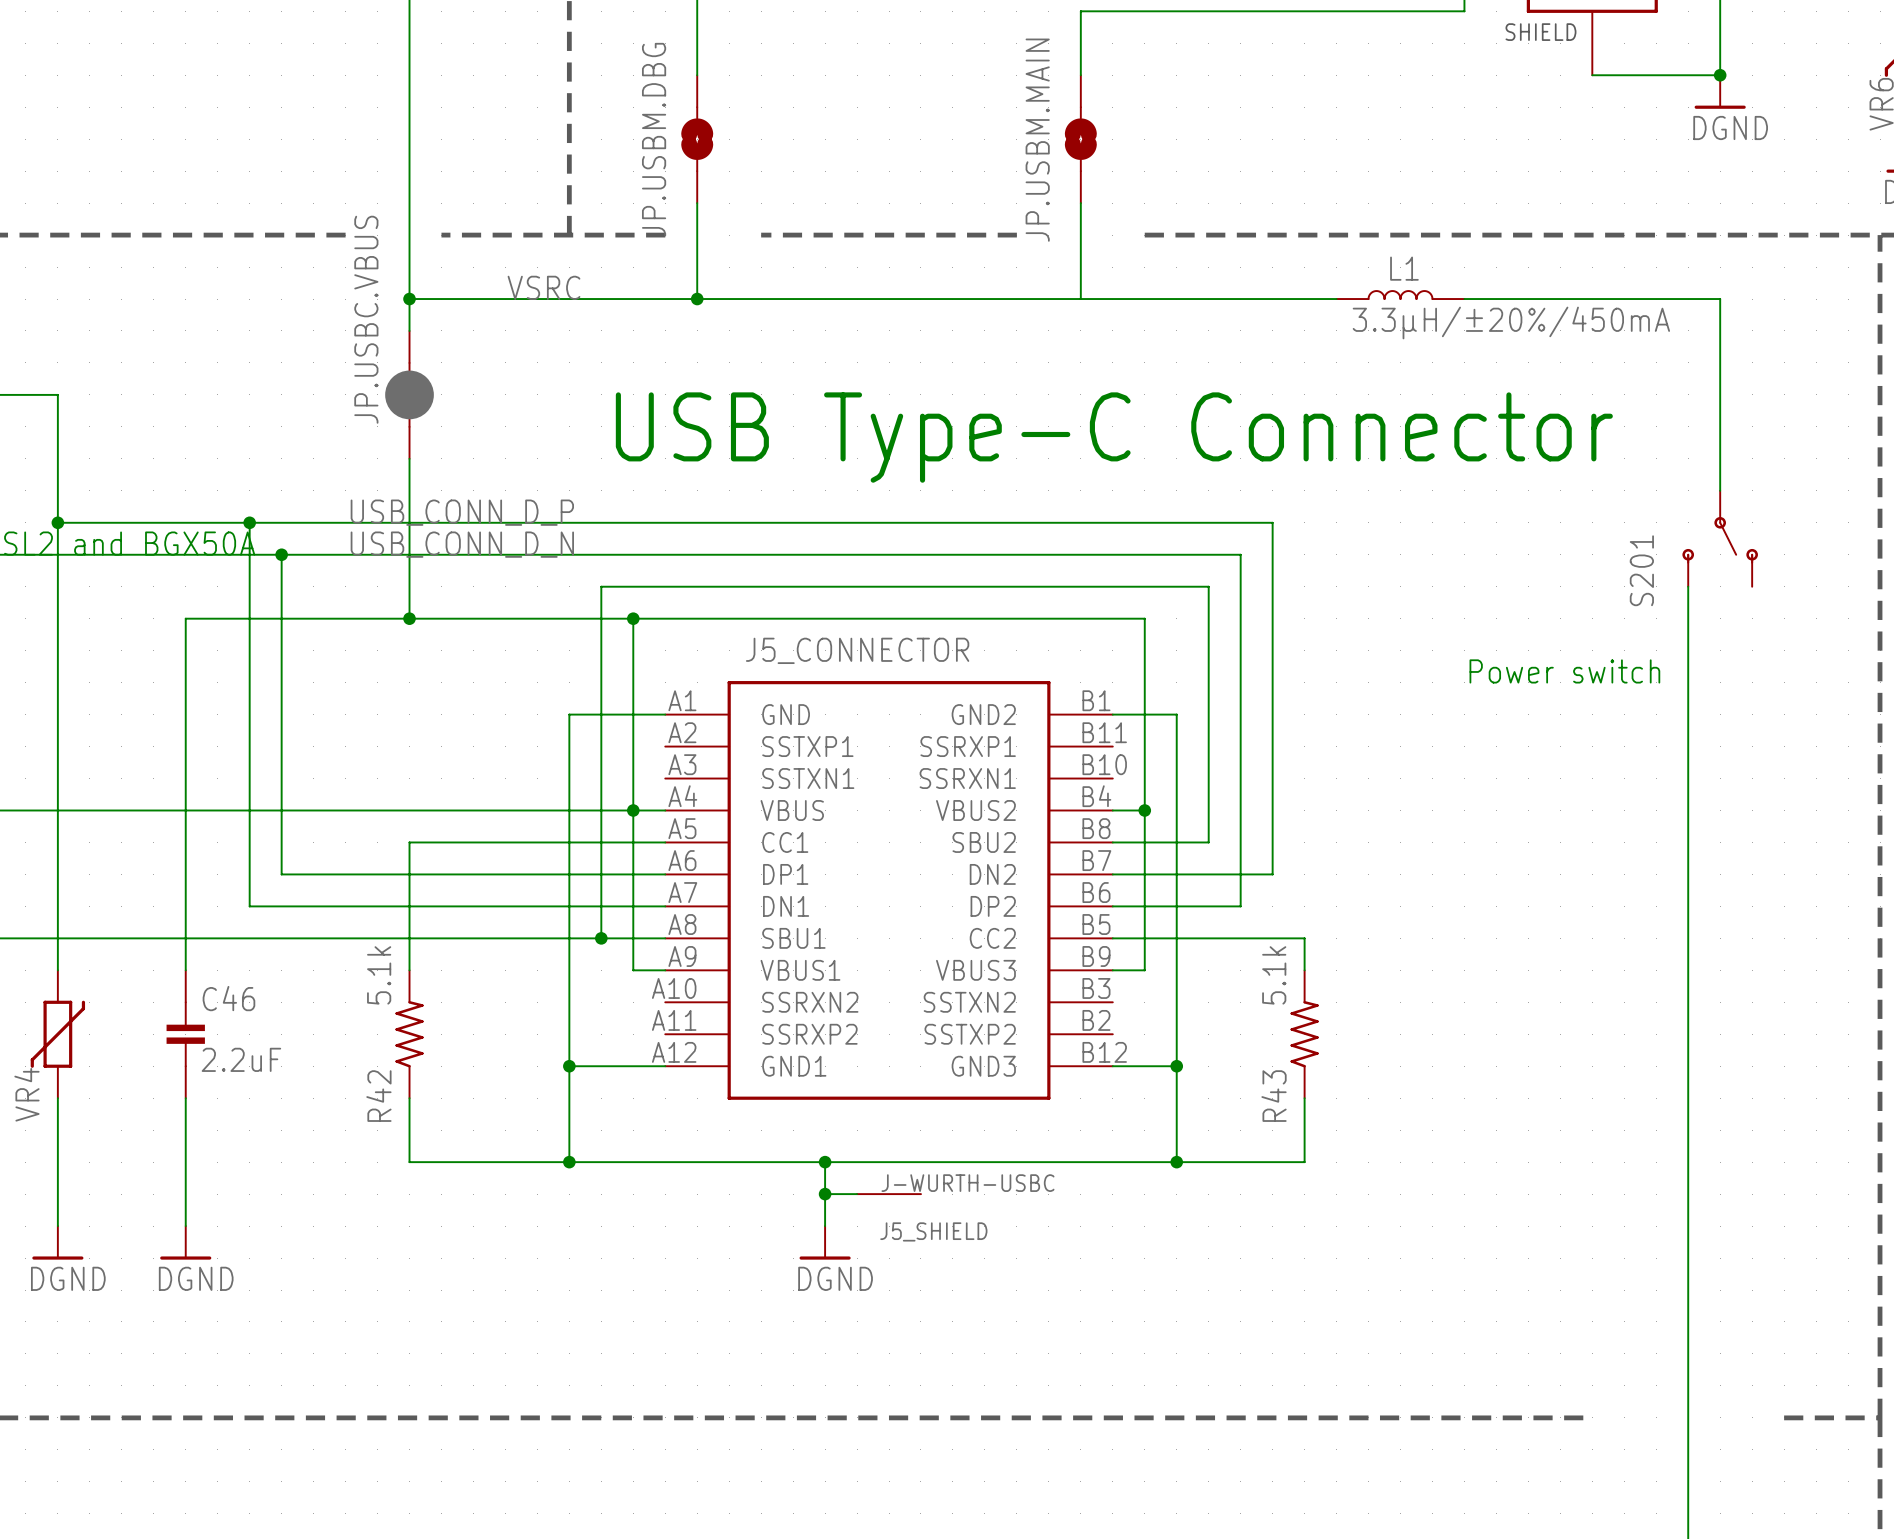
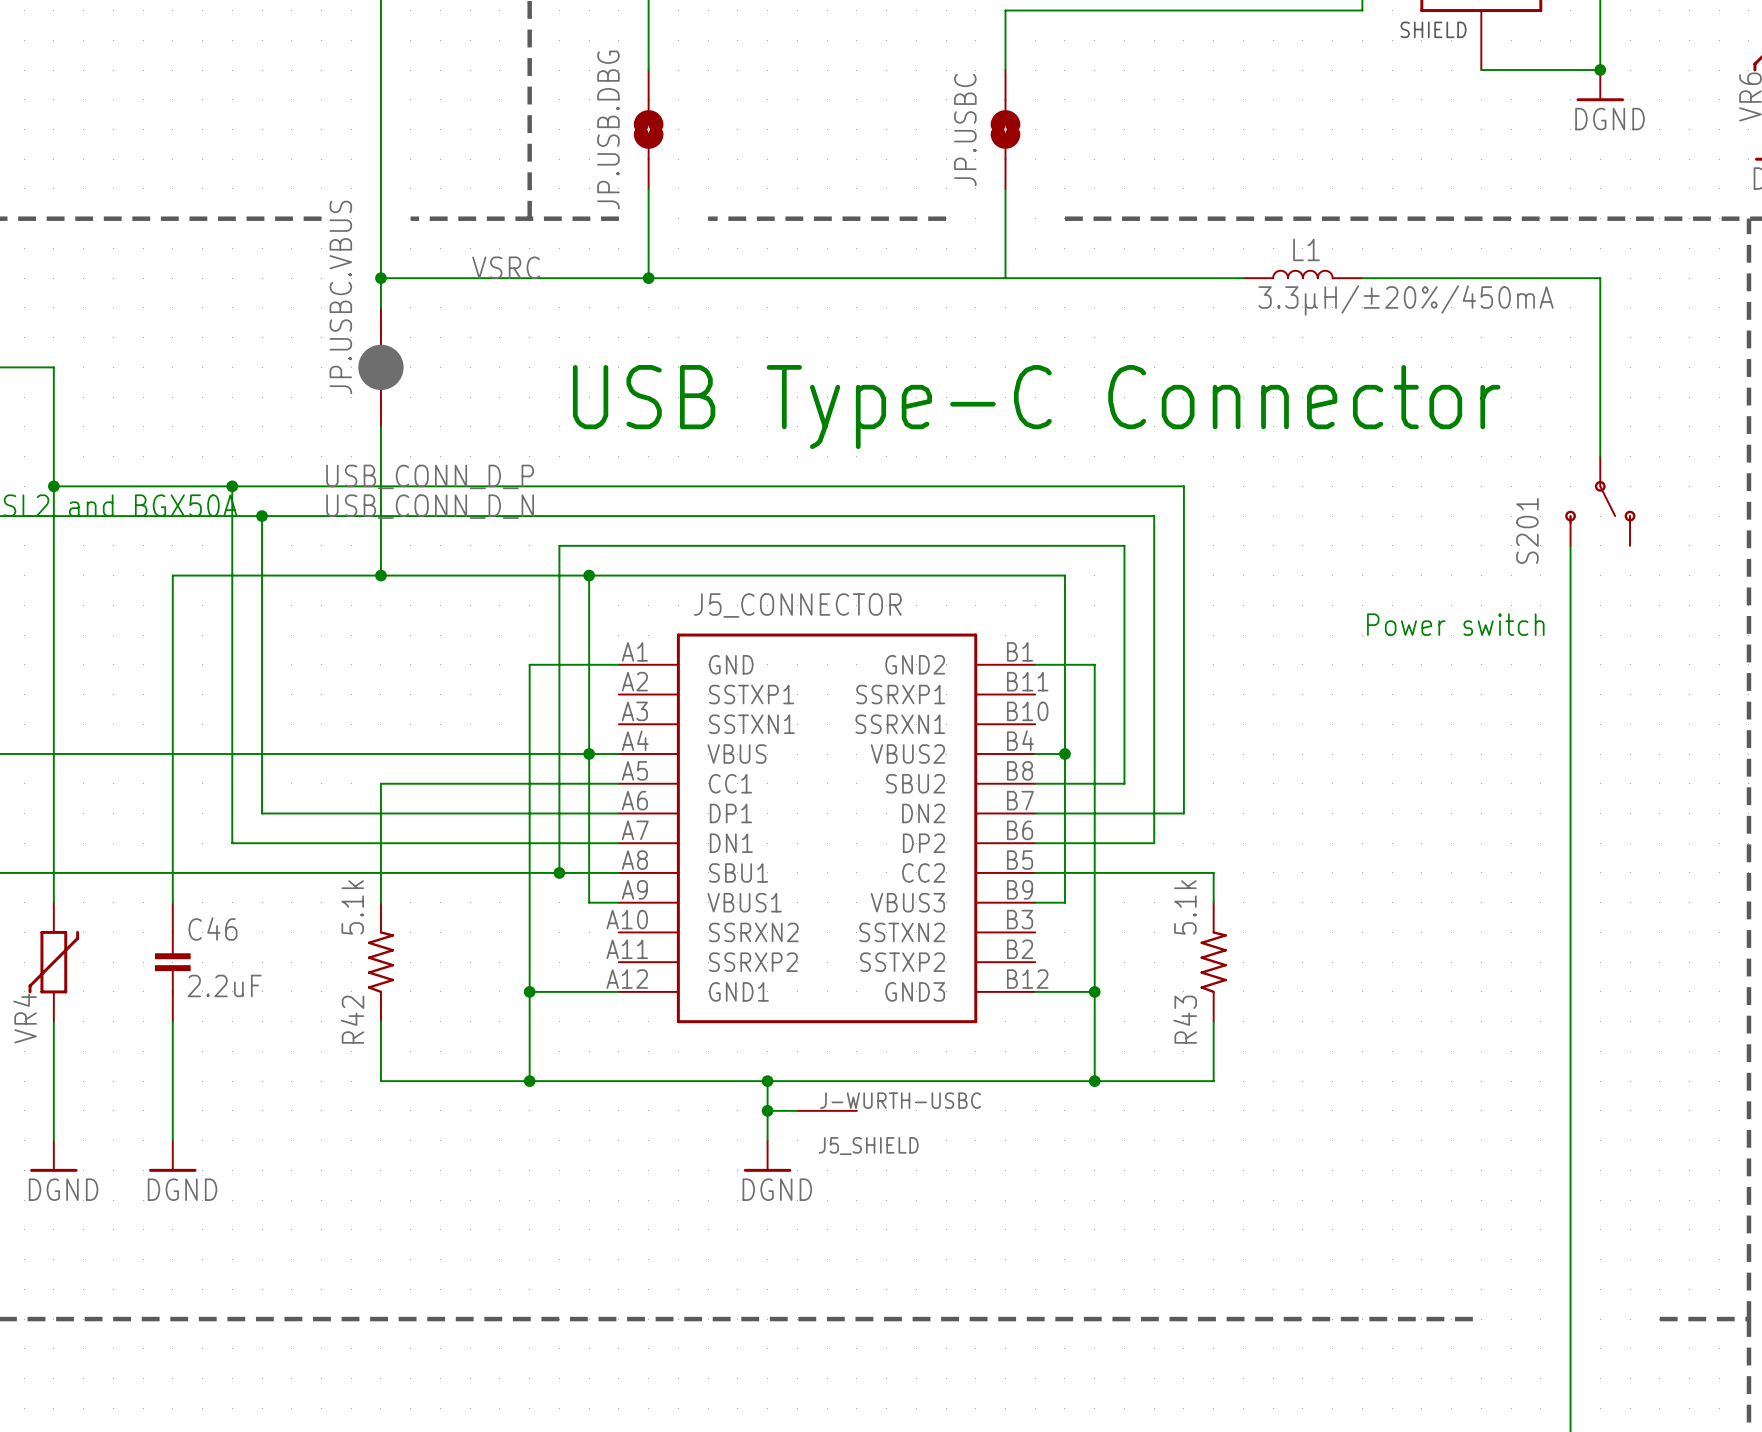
JP.USBM.DBG name: JP.USBM.DBG (654, 139) -> JP.USB.DBG (608, 129)
JP.USBM.MAIN name: JP.USBM.MAIN (1037, 140) -> JP.USBC (965, 129)

